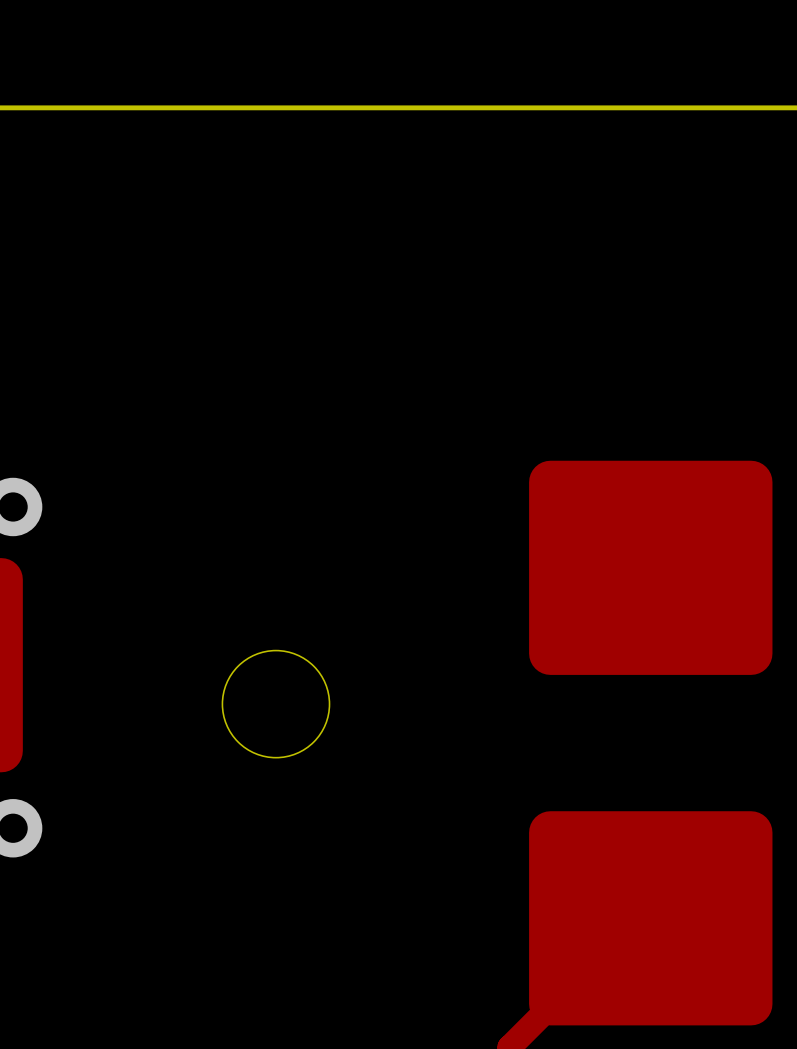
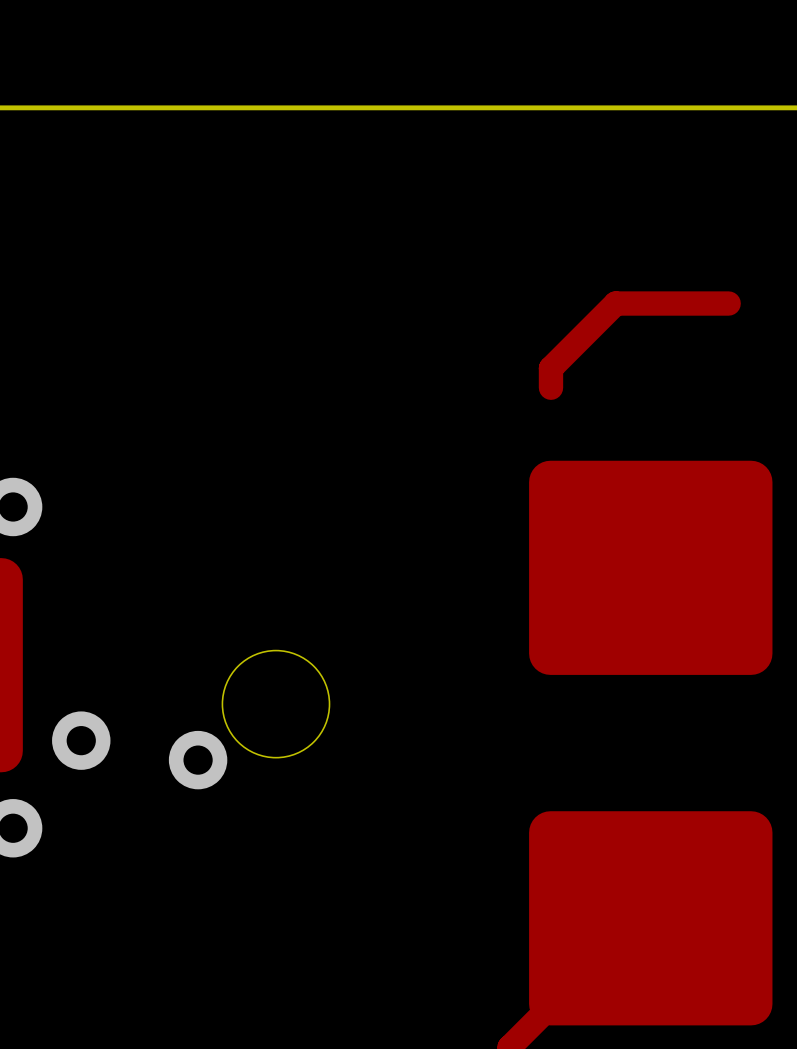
track: none -> (728, 303) (615, 303) (550, 368) (550, 387)
via: none -> (81, 740)
via: none -> (198, 760)

